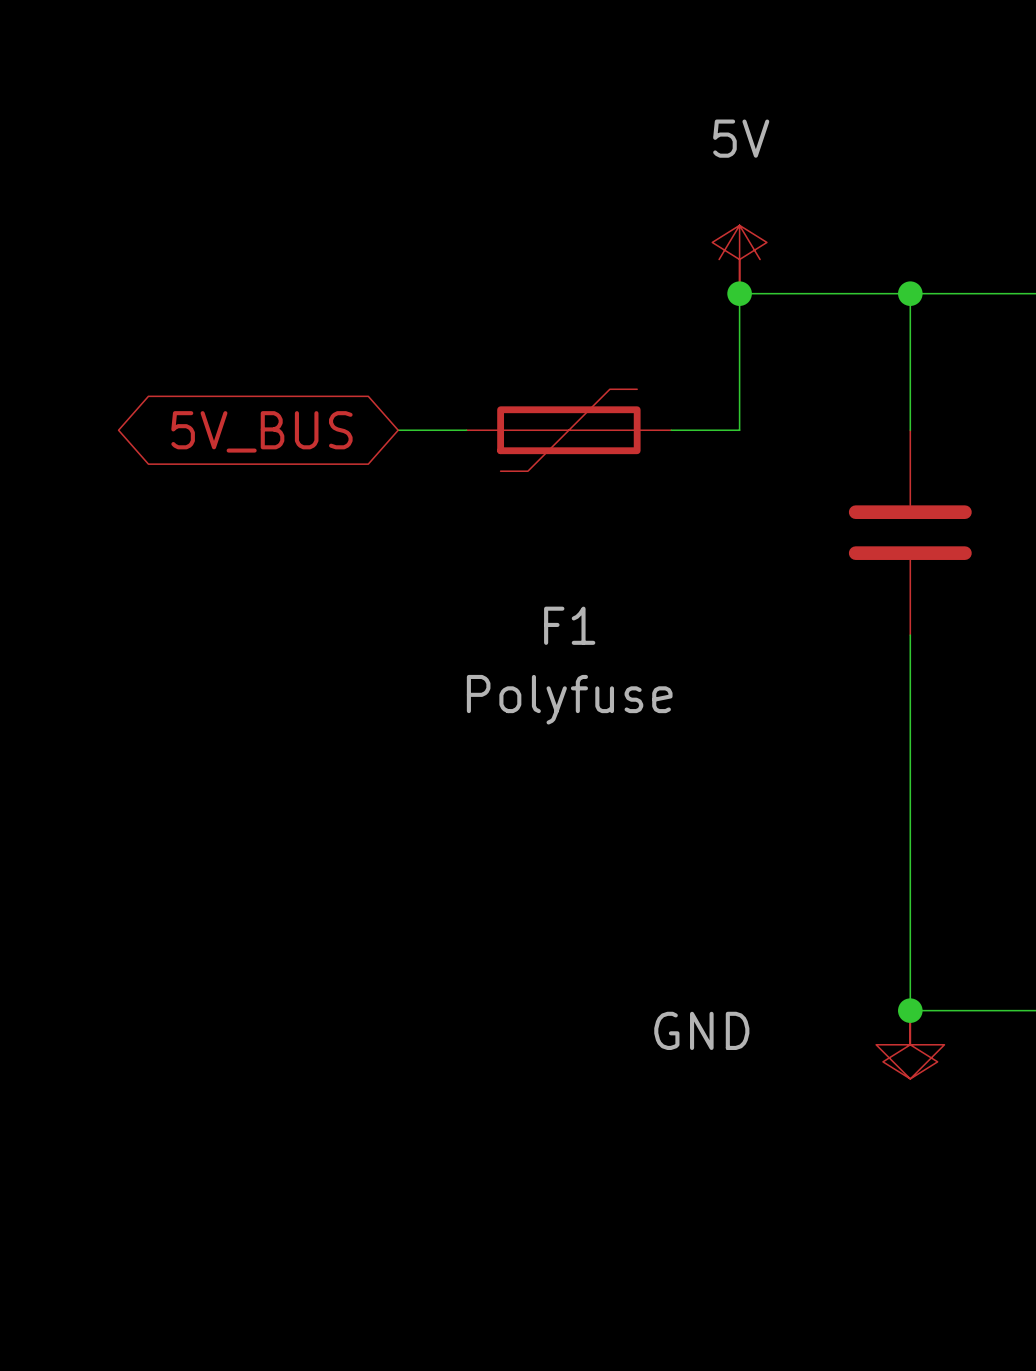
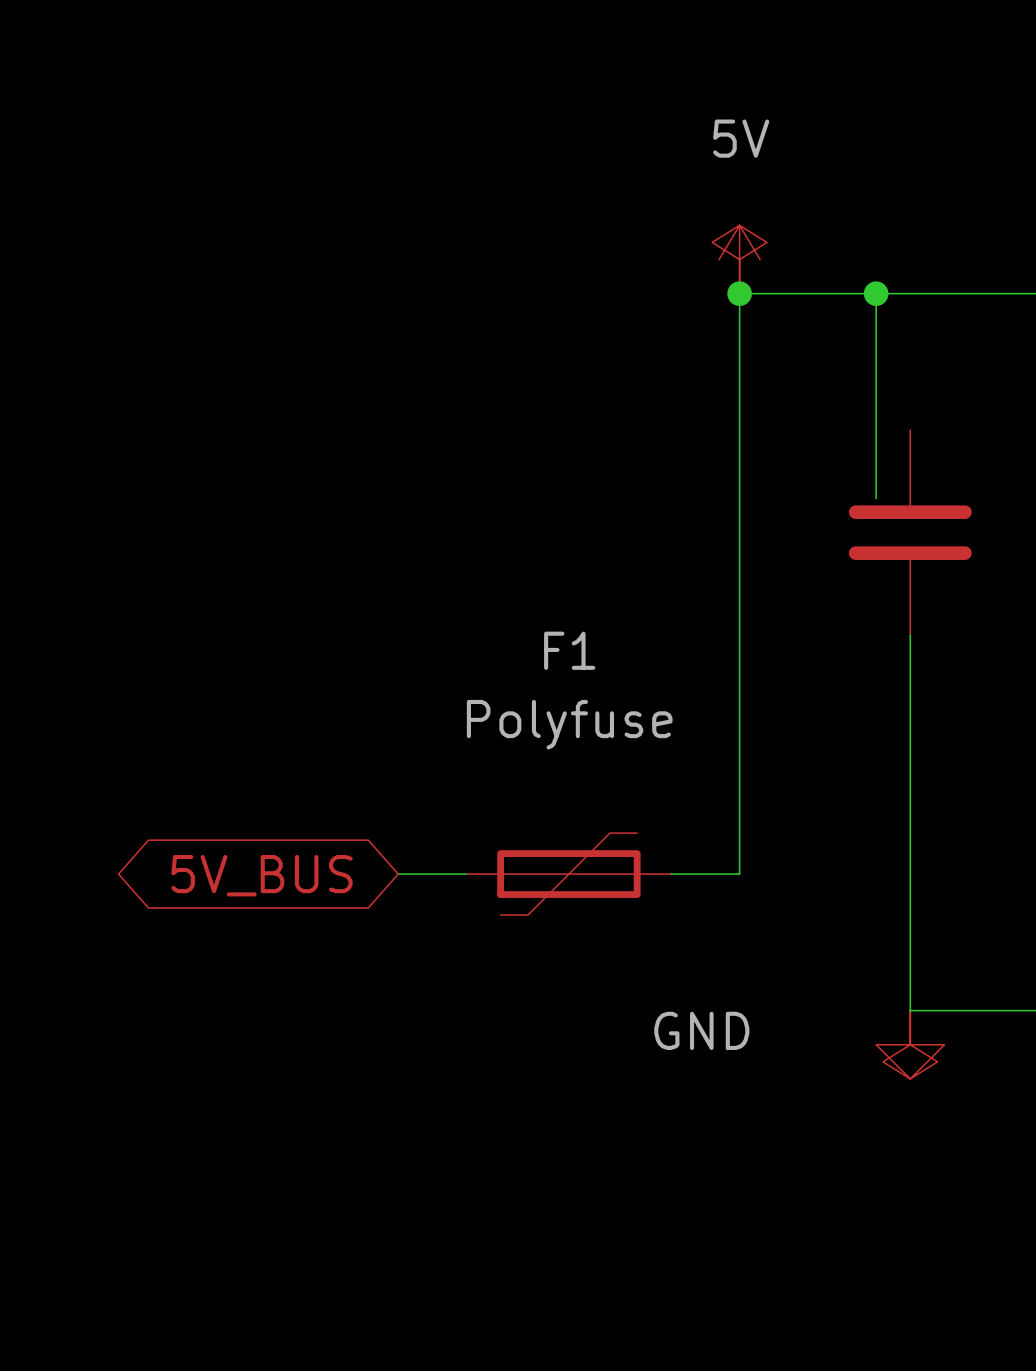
wire: none -> (876, 293) (876, 498)
wire: (910, 293) (910, 430) -> none
junction position: (910, 293) -> (876, 293)
wire: (398, 430) (466, 430) -> (398, 874) (466, 874)
F1 position: (568, 430) -> (568, 874)
wire: (671, 430) (739, 430) -> (671, 874) (739, 874) (739, 430)
global label position: 5V_BUS (261, 431) -> 5V_BUS (261, 875)
F1 name position: F1 (569, 625) -> F1 (569, 650)
F1 value position: Polyfuse (569, 699) -> Polyfuse (569, 724)
junction: (910, 1010) -> none

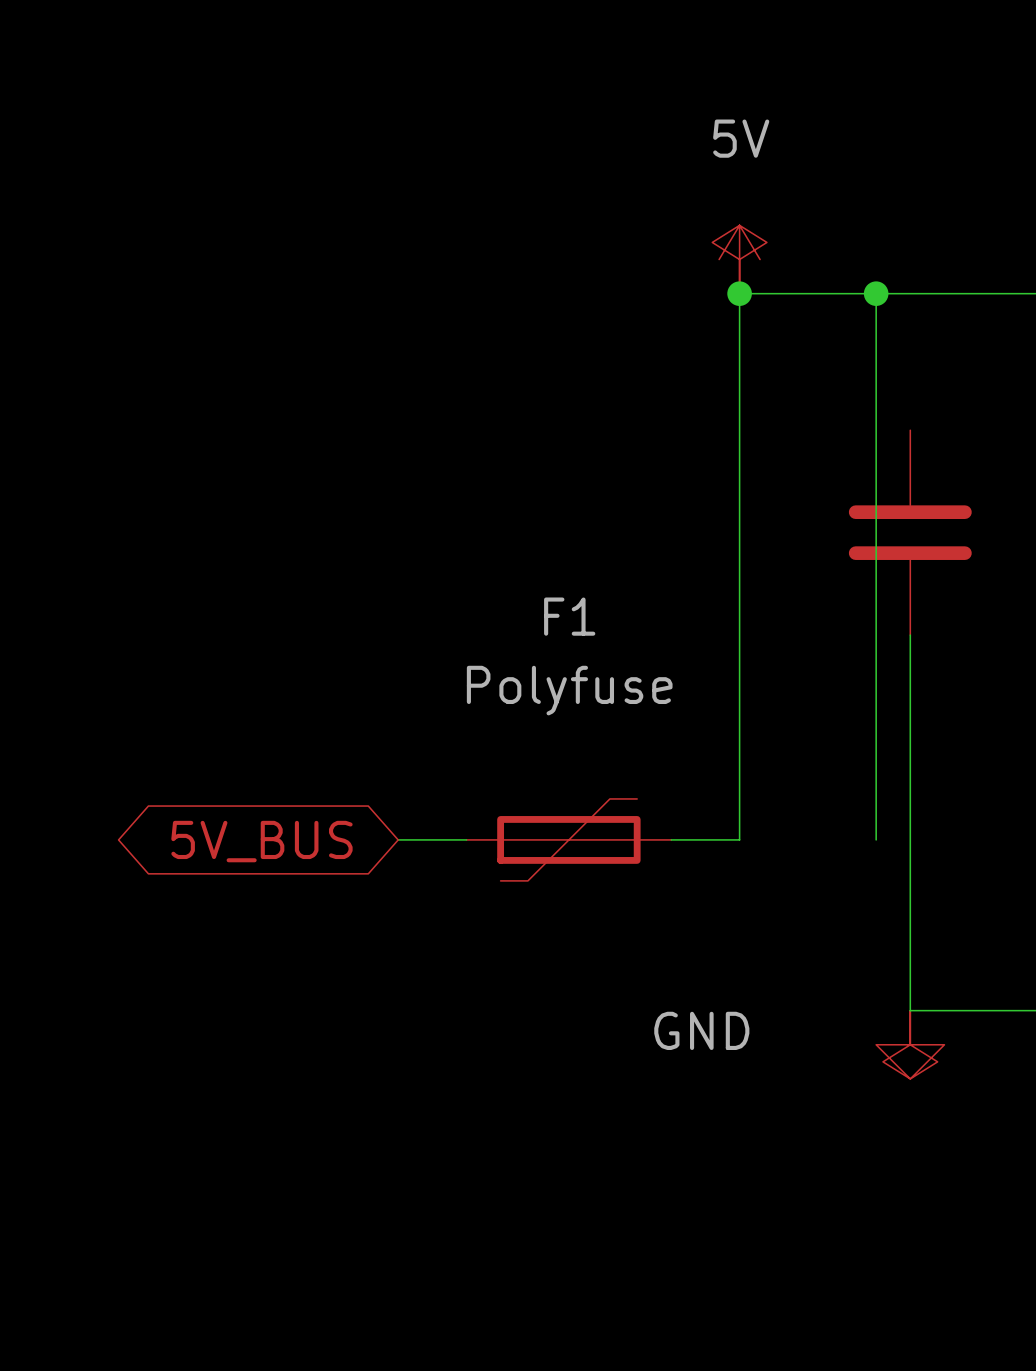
wire: none -> (876, 498) (876, 839)
wire: (739, 839) (739, 874) (671, 874) -> (739, 839) (671, 839)
wire: (398, 874) (466, 874) -> (398, 839) (466, 839)
F1 position: (568, 874) -> (568, 839)
global label position: 5V_BUS (261, 875) -> 5V_BUS (261, 841)

